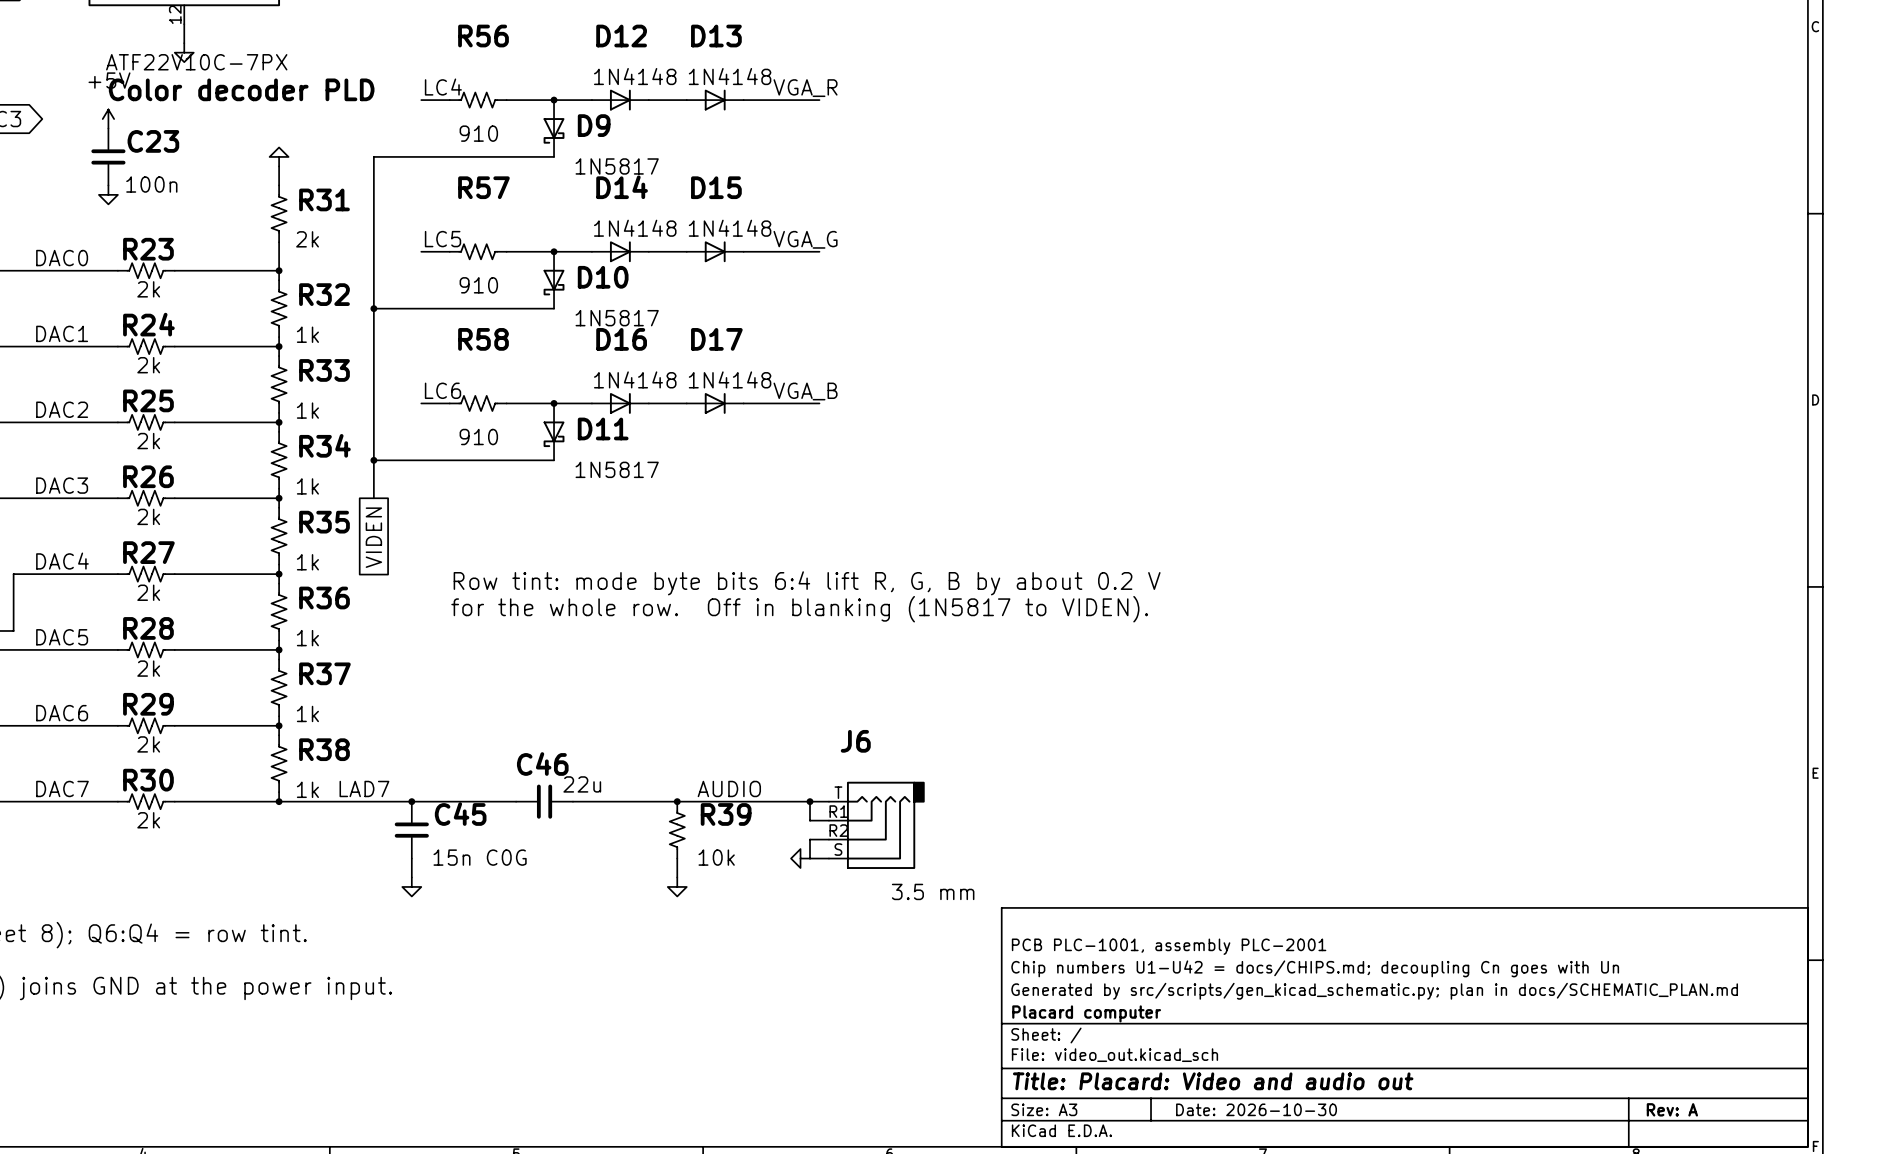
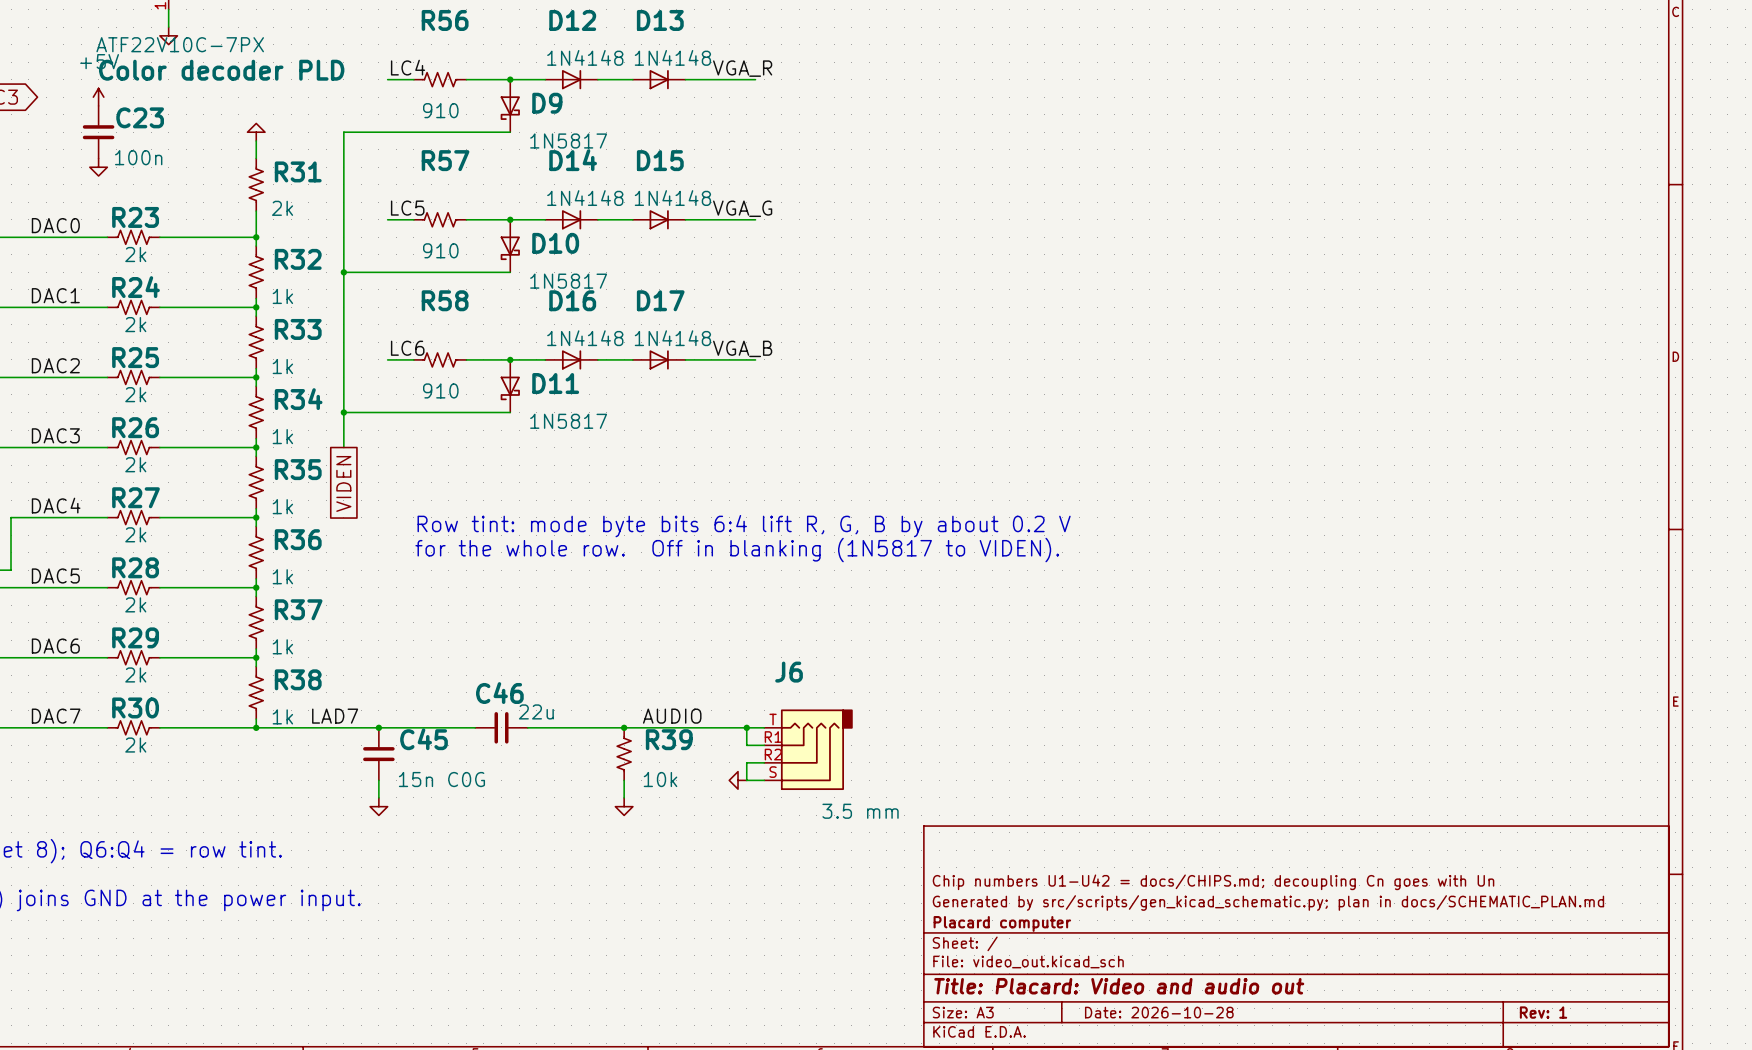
title block: PCB PLC-1001, assembly PLC-2001 (1169, 946) -> none
title block: Date: 2026-10-30 (1256, 1109) -> Date: 2026-10-28 (1159, 1012)
title block: Rev: A (1672, 1109) -> Rev: 1 (1543, 1012)

